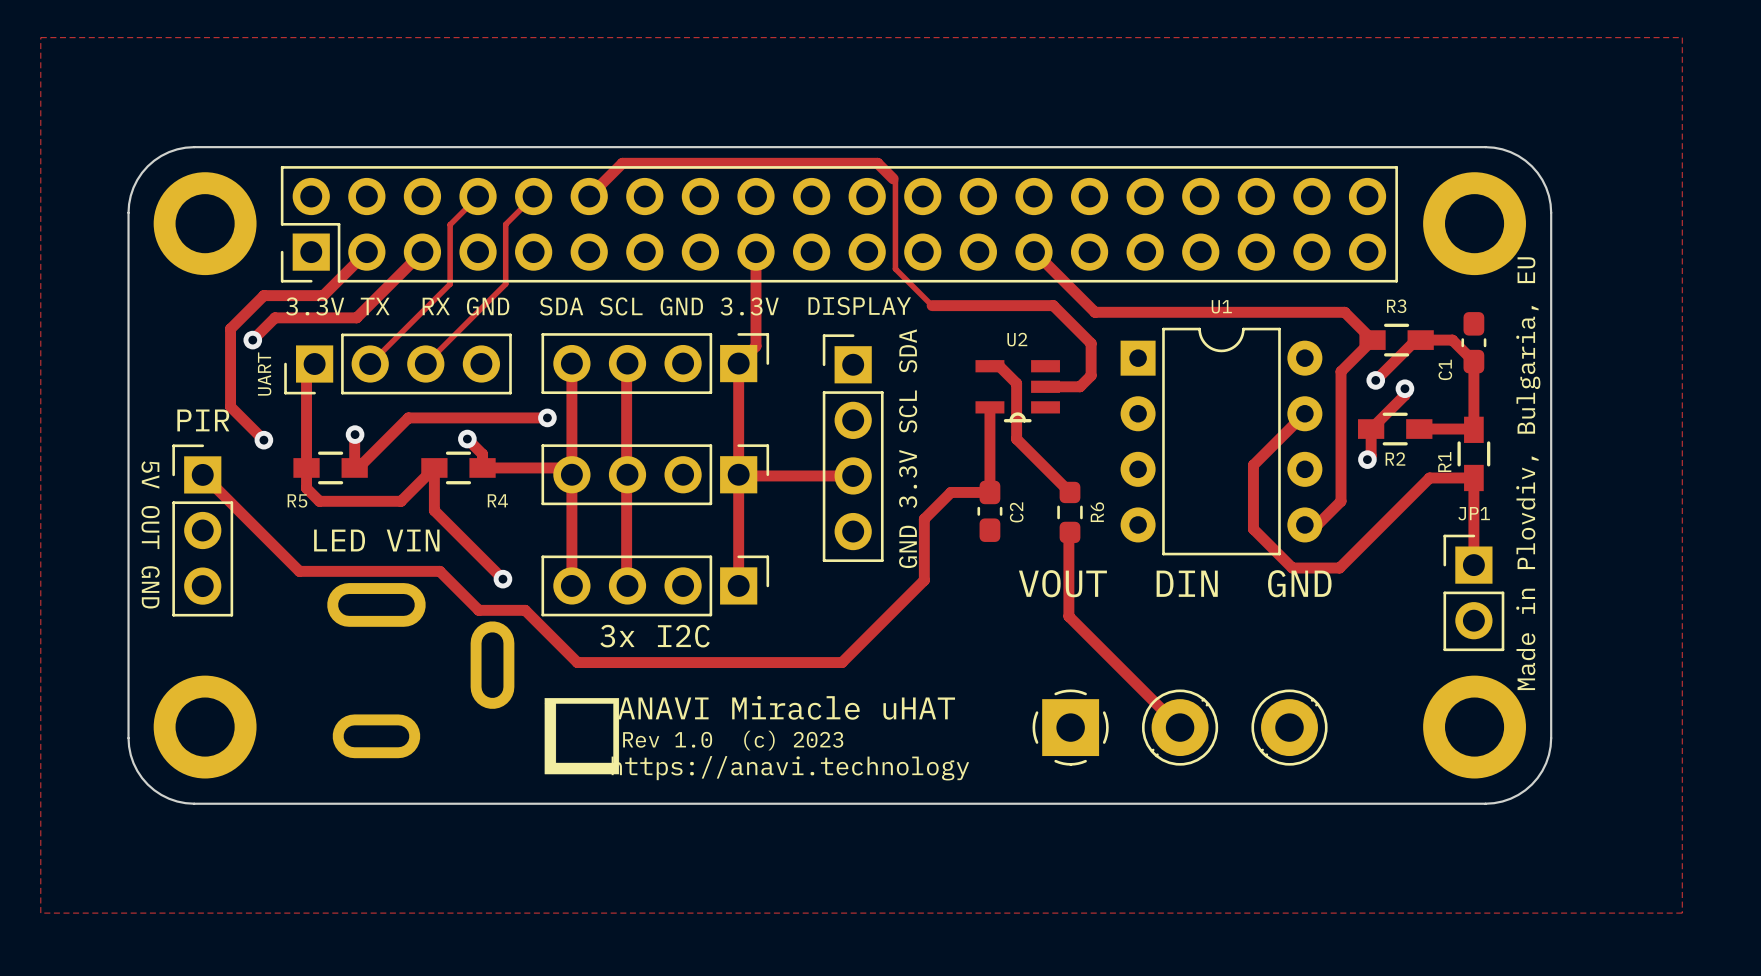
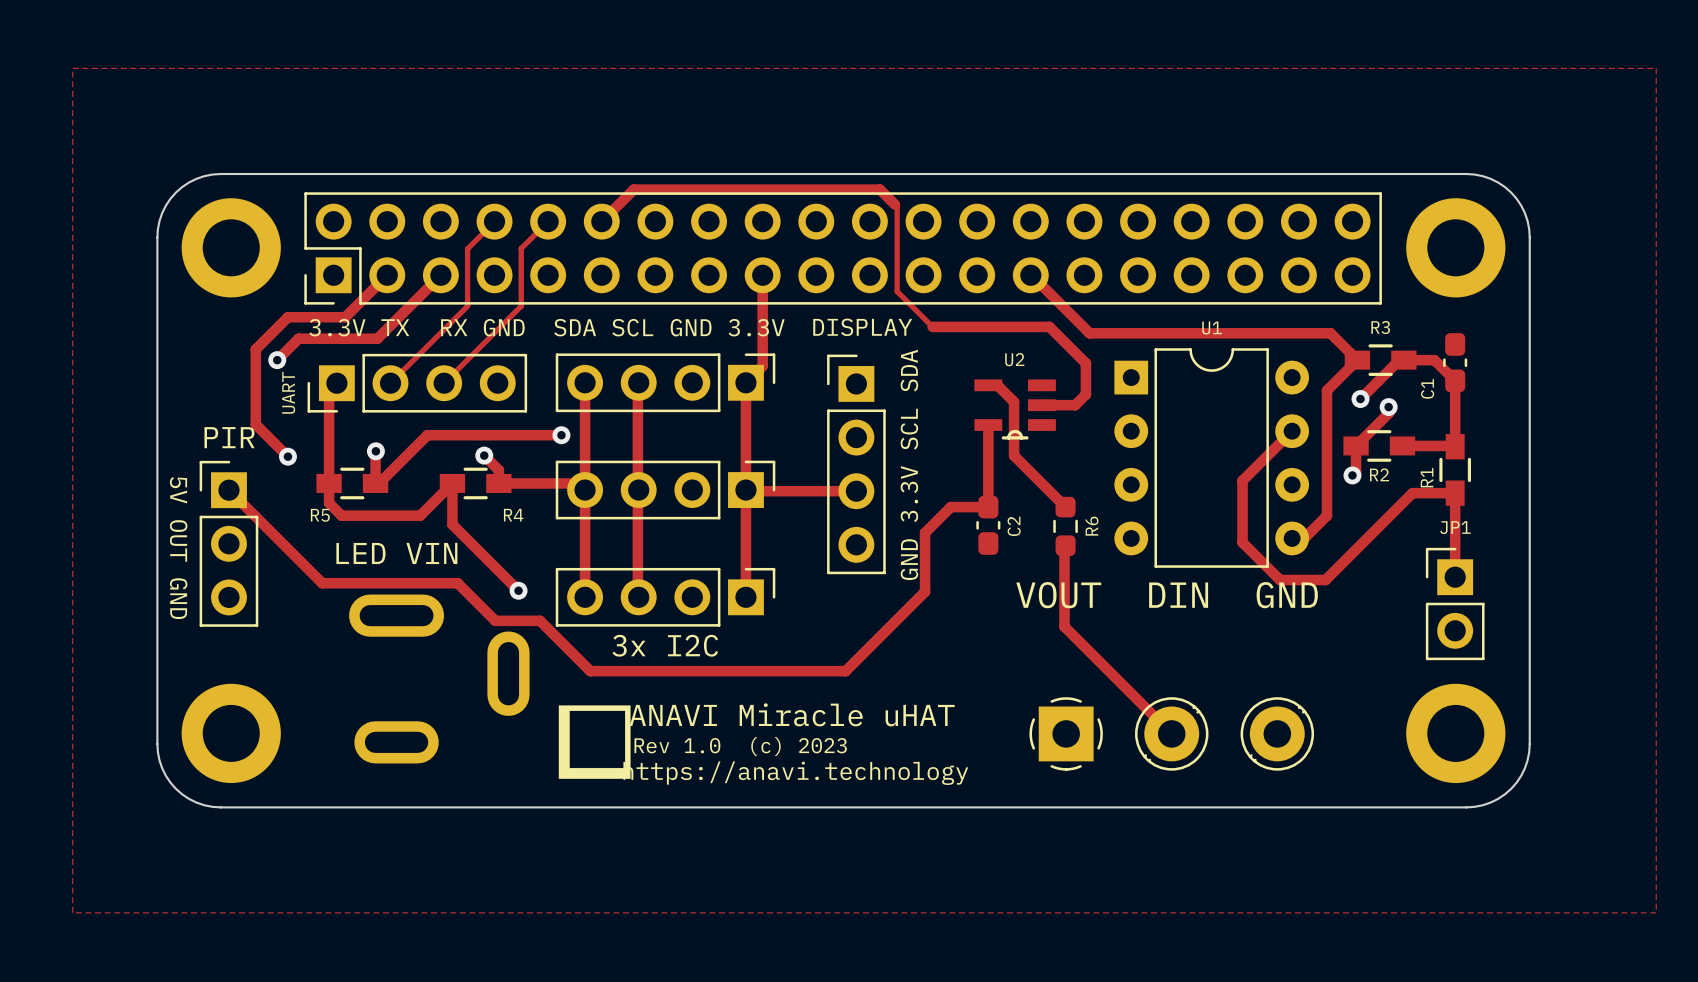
text: Made in Plovdiv, Bulgaria, EU (1528, 473) -> none

